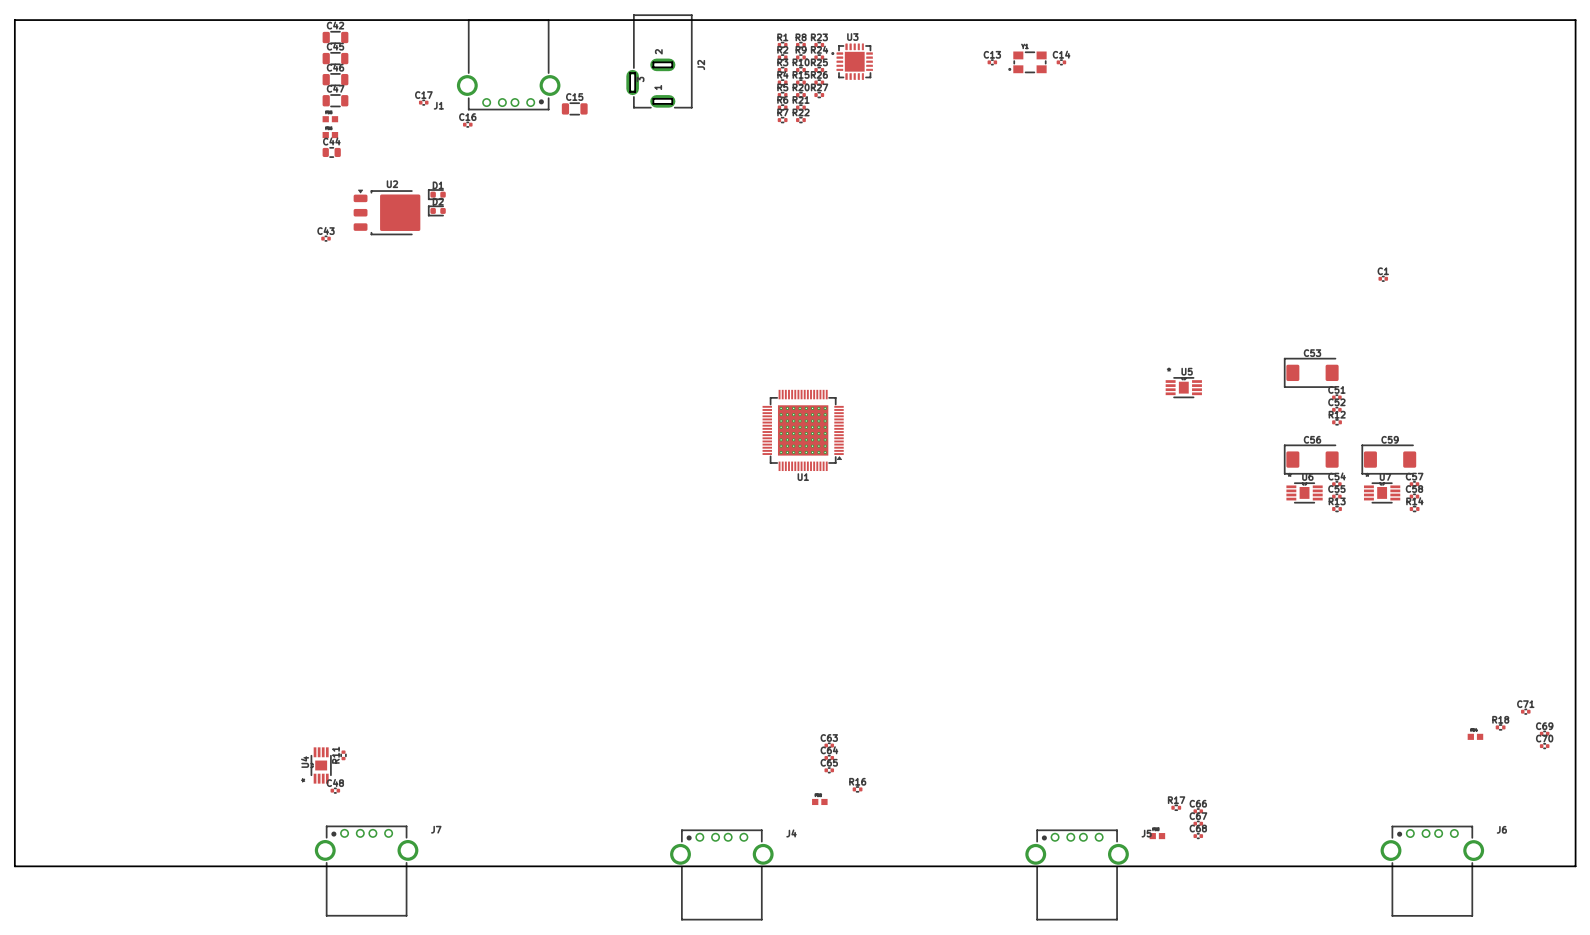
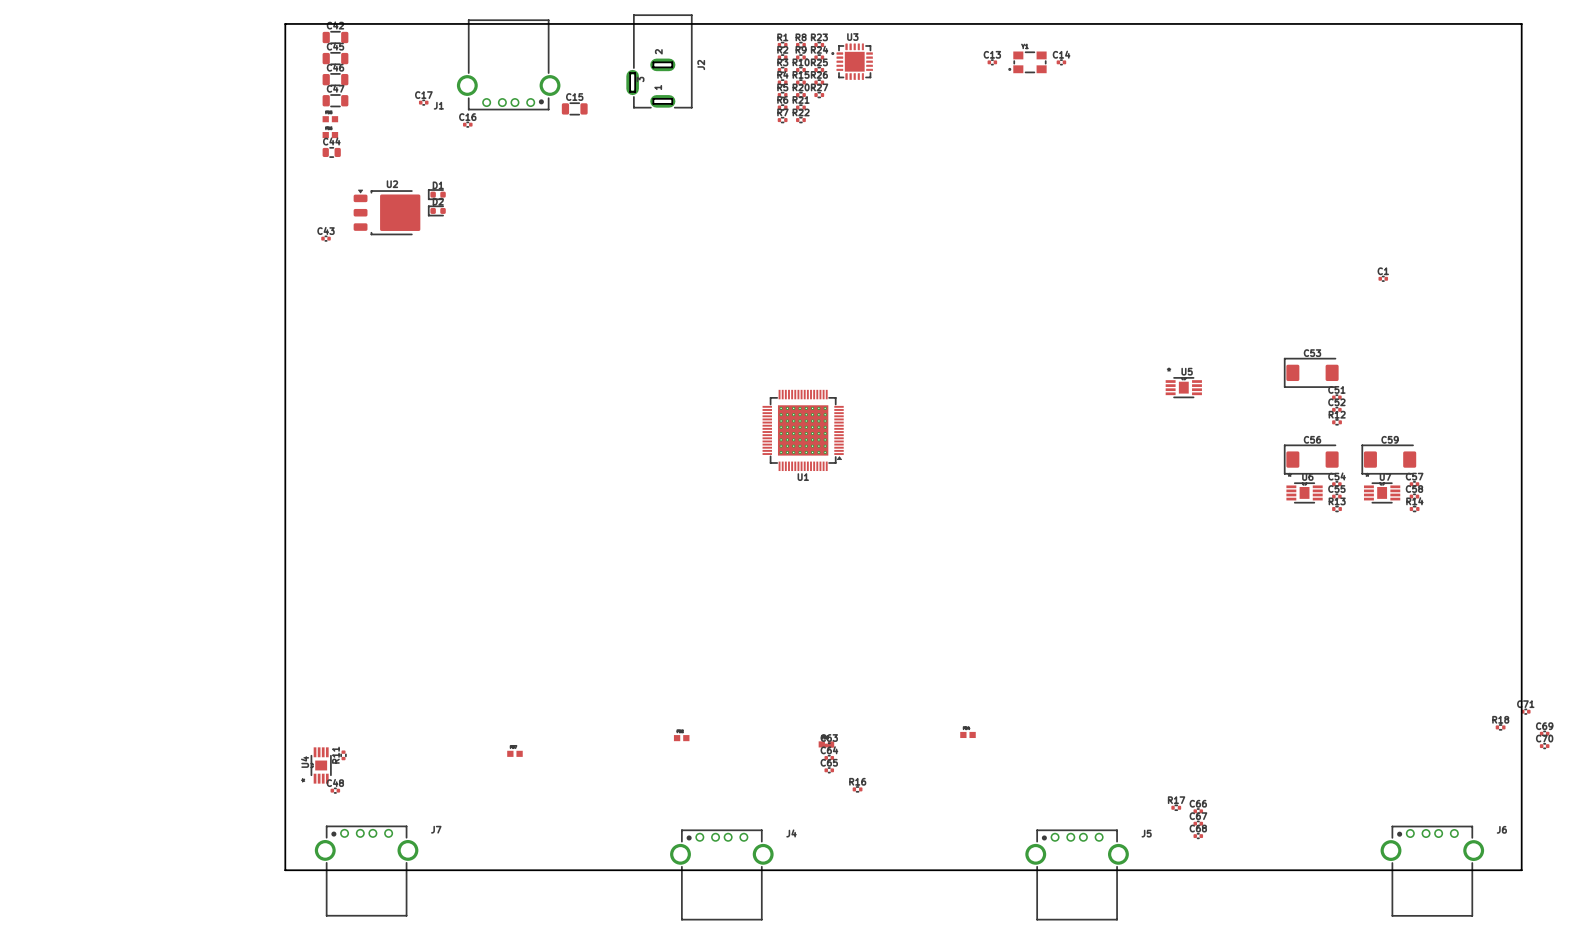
board edge: (14, 20) (1575, 20) (1575, 866) (14, 866) (14, 20) -> (285, 23) (285, 870) (1521, 870) (1521, 23) (285, 23)
part position: (1475, 736) -> (967, 734)
part: none -> (514, 753)
part position: (819, 801) -> (681, 738)
part position: (1157, 836) -> (826, 744)

